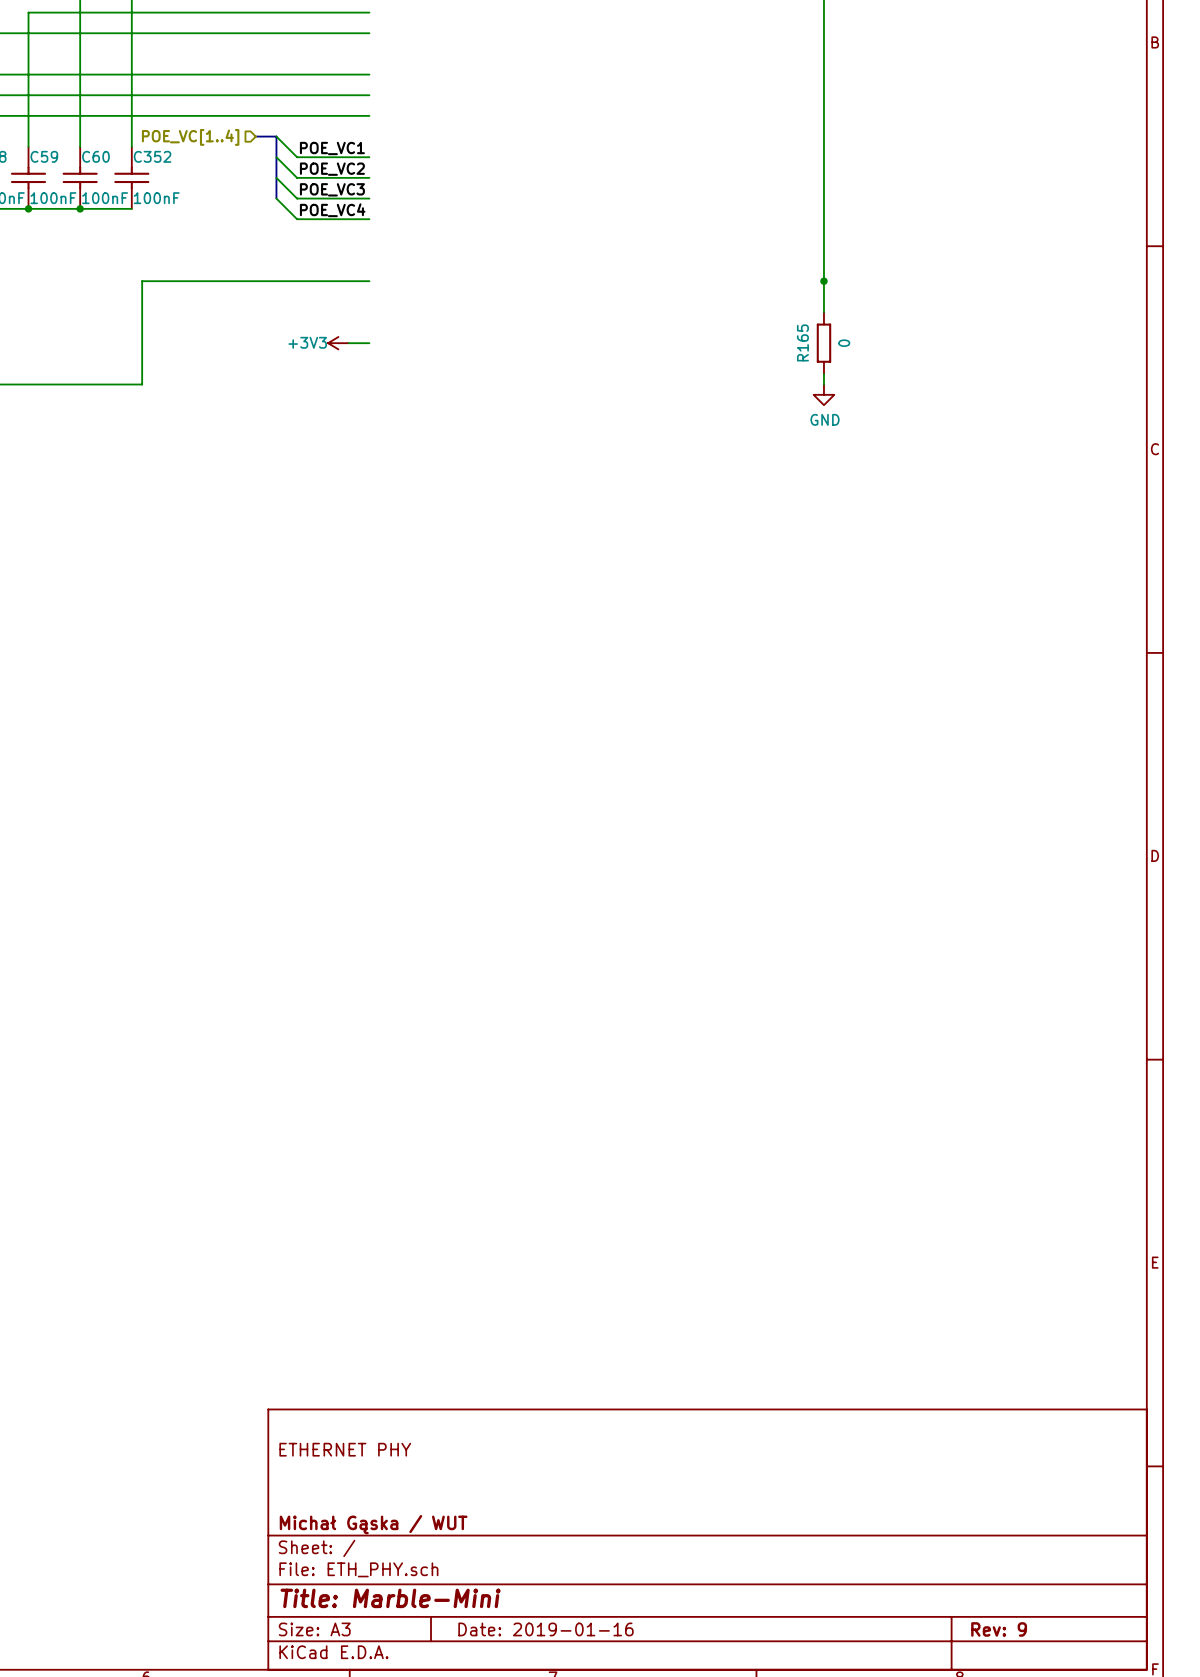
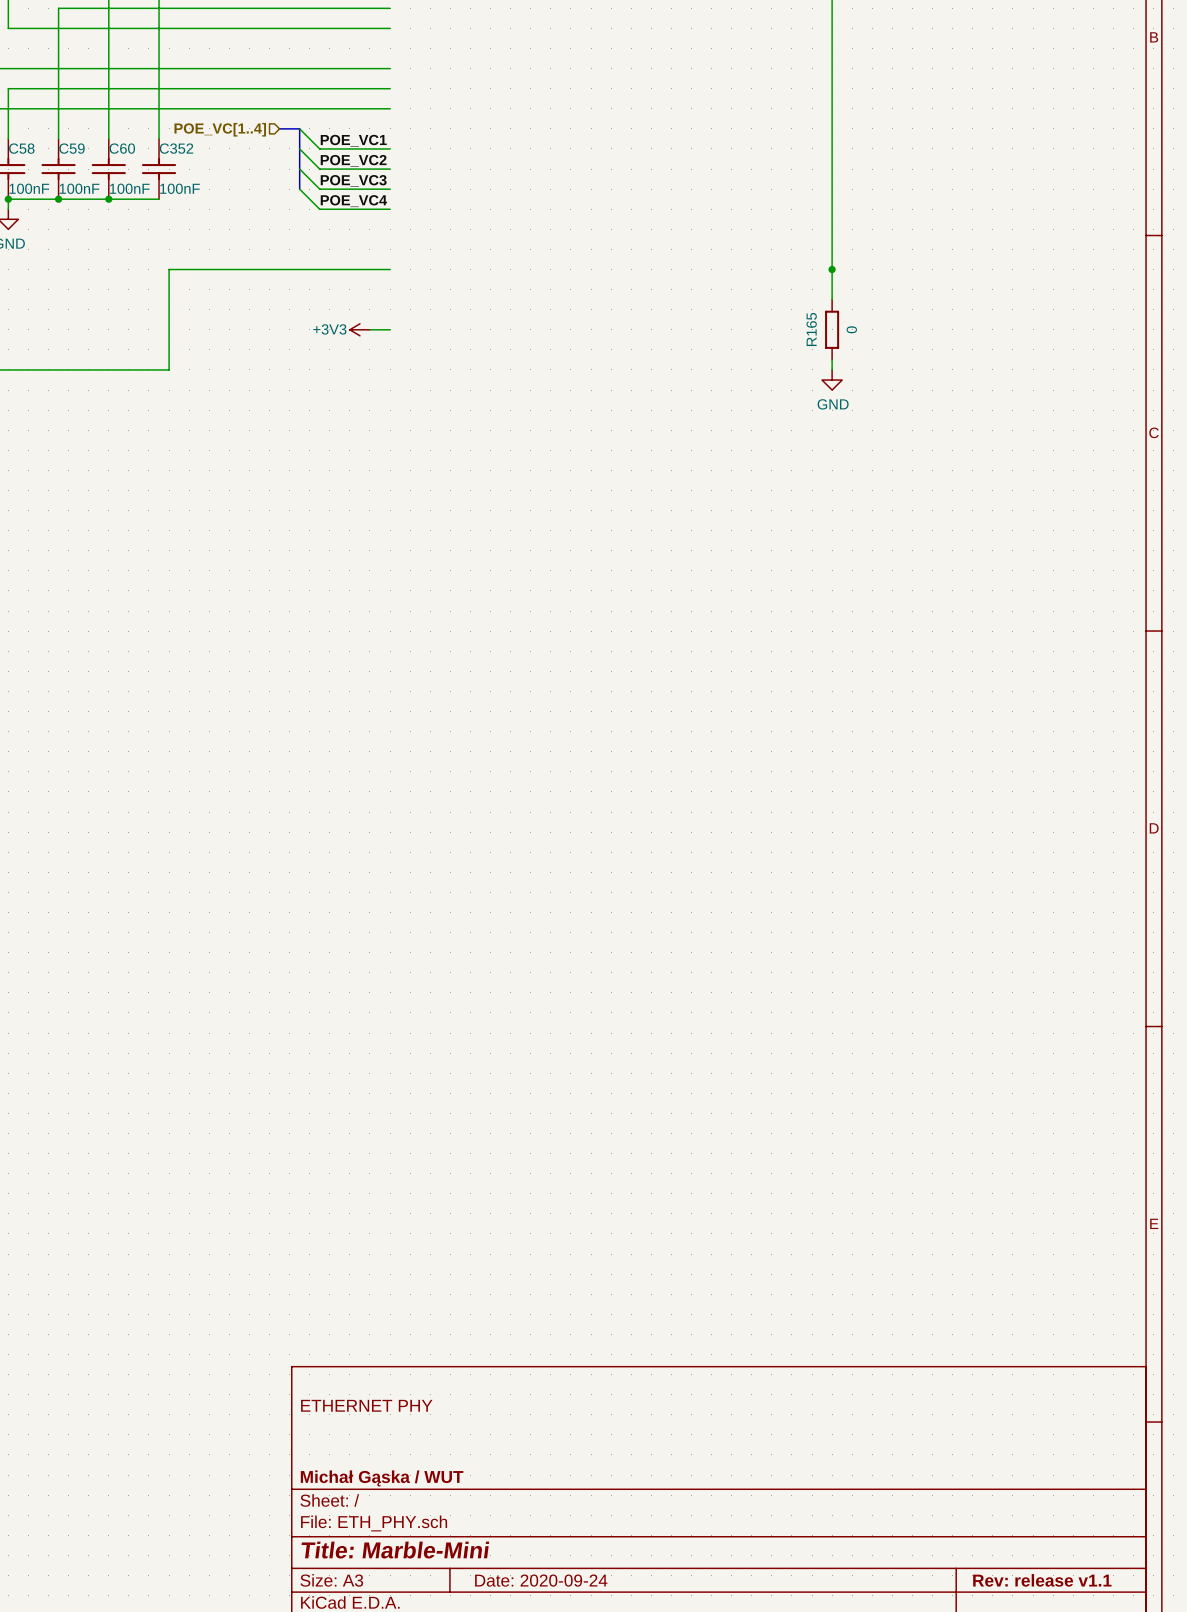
title block: Date: 2019-01-16 (545, 1629) -> Date: 2020-09-24 (541, 1580)
title block: Rev: 9 (999, 1629) -> Rev: release v1.1 (1042, 1580)

